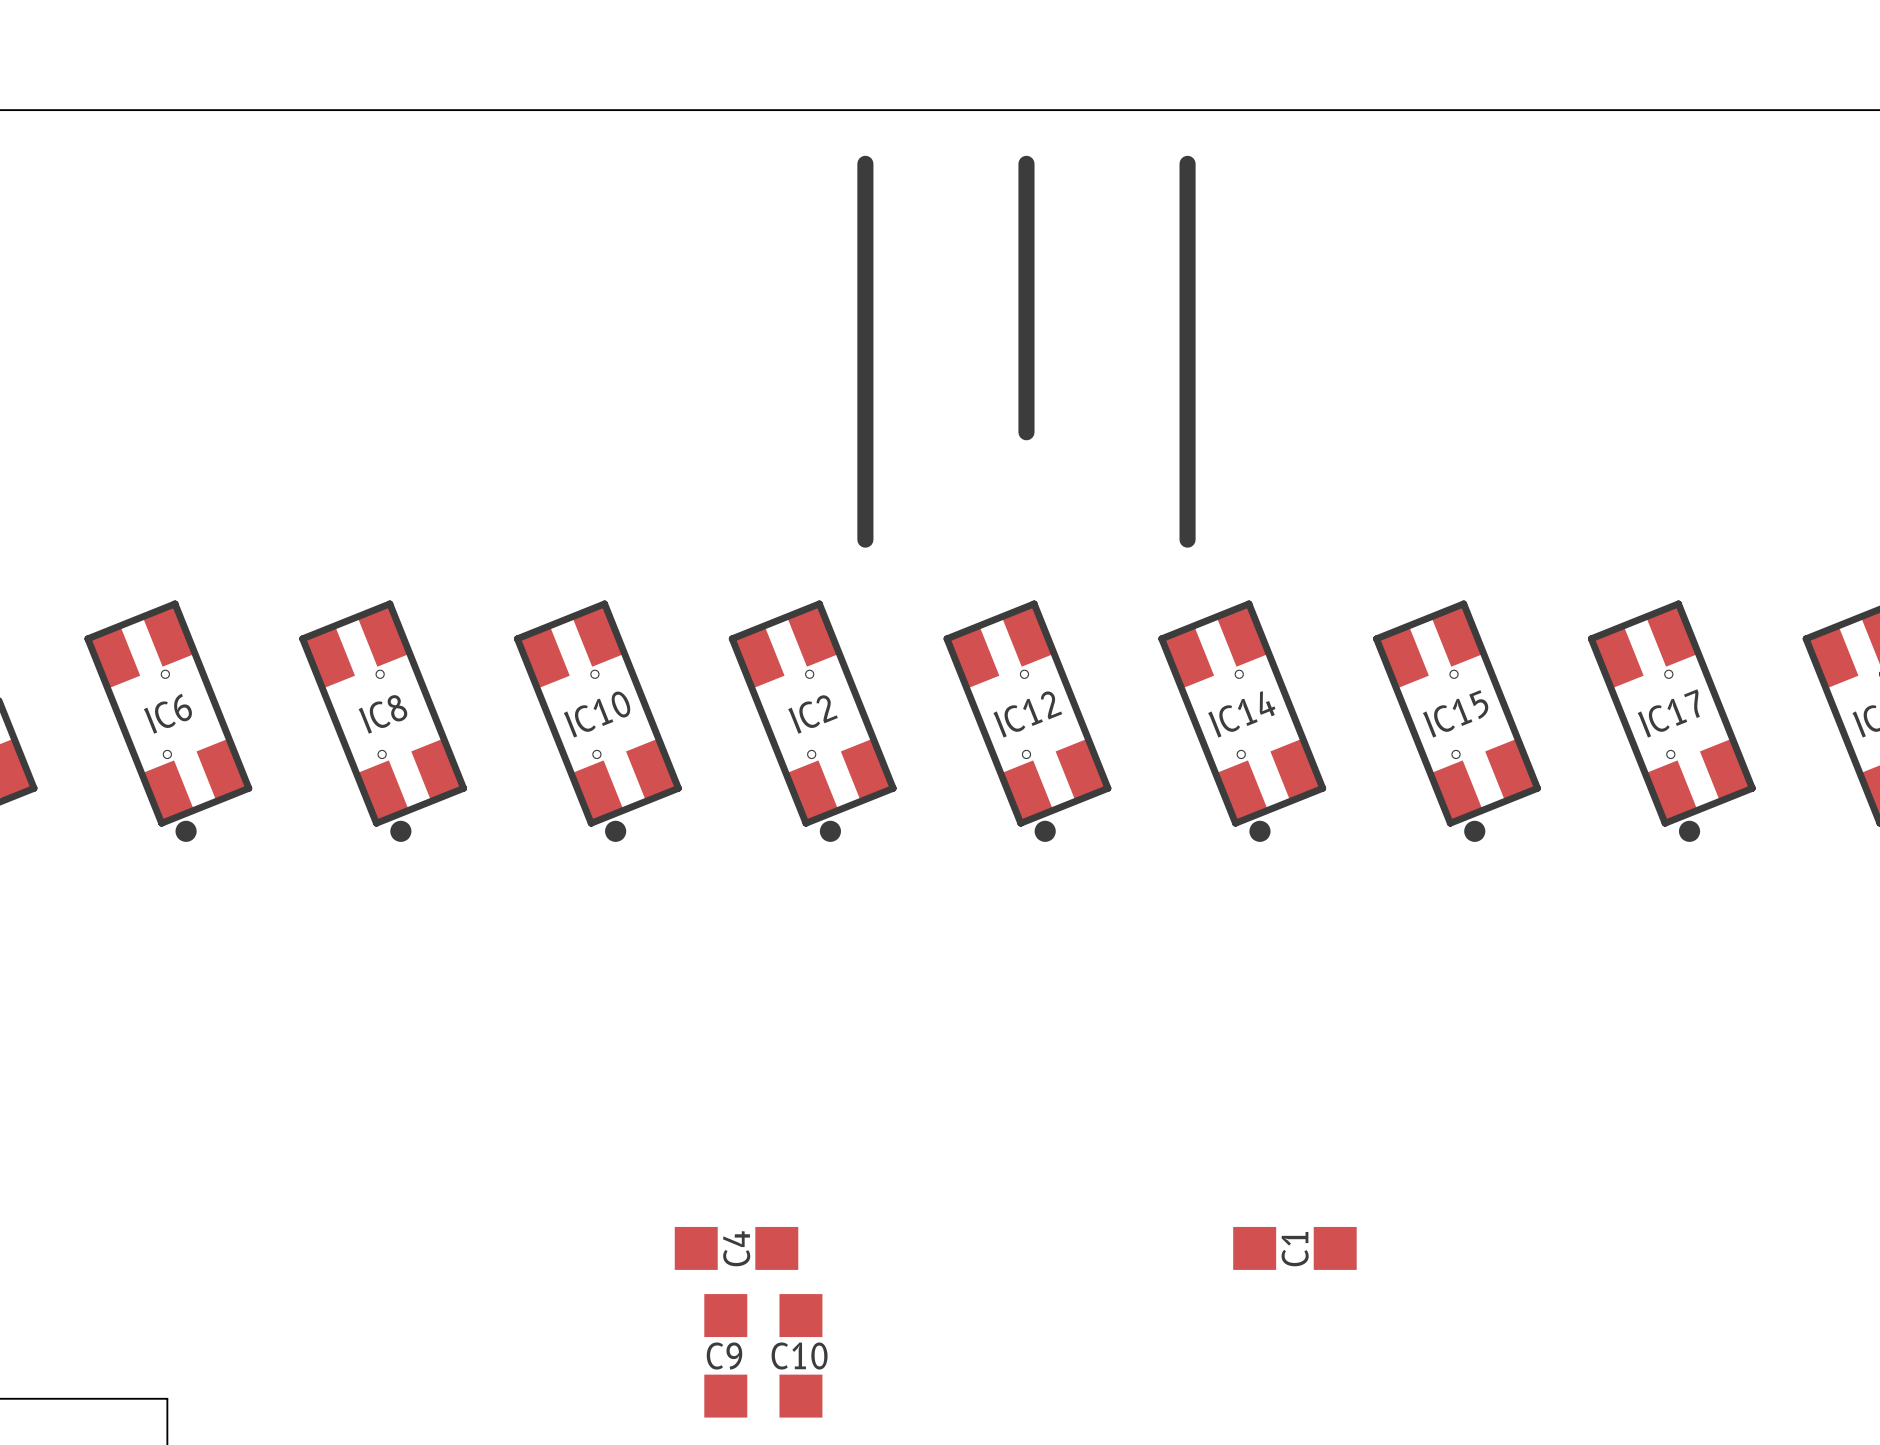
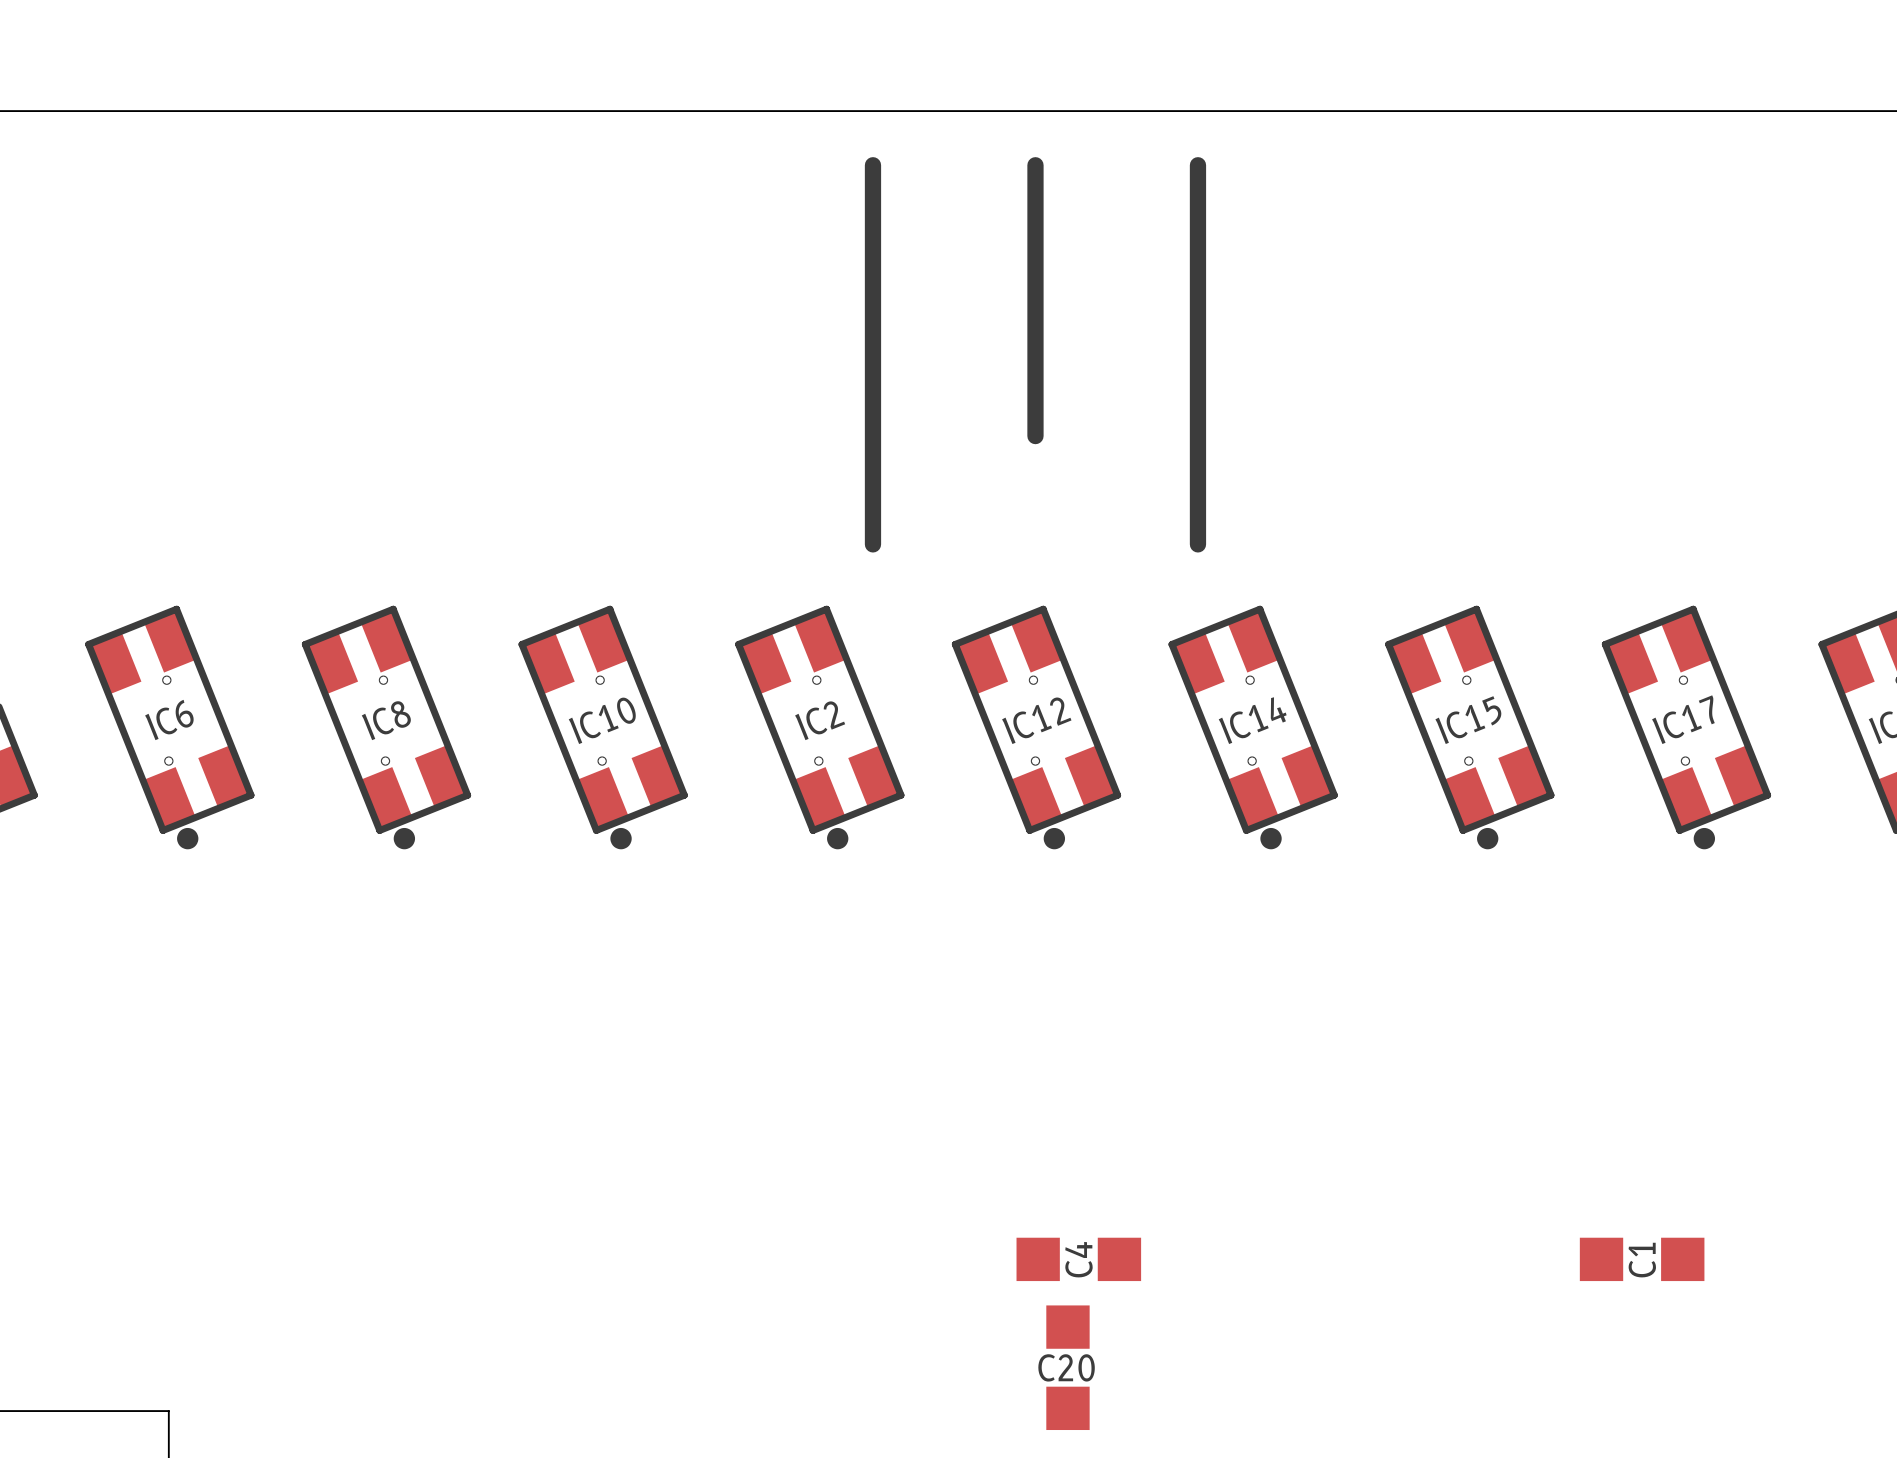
C4 position: (736, 1248) -> (1078, 1259)
C1 position: (1294, 1248) -> (1642, 1259)
C9: (725, 1355) -> none
C10: (800, 1355) -> none
C20: none -> (1067, 1367)

